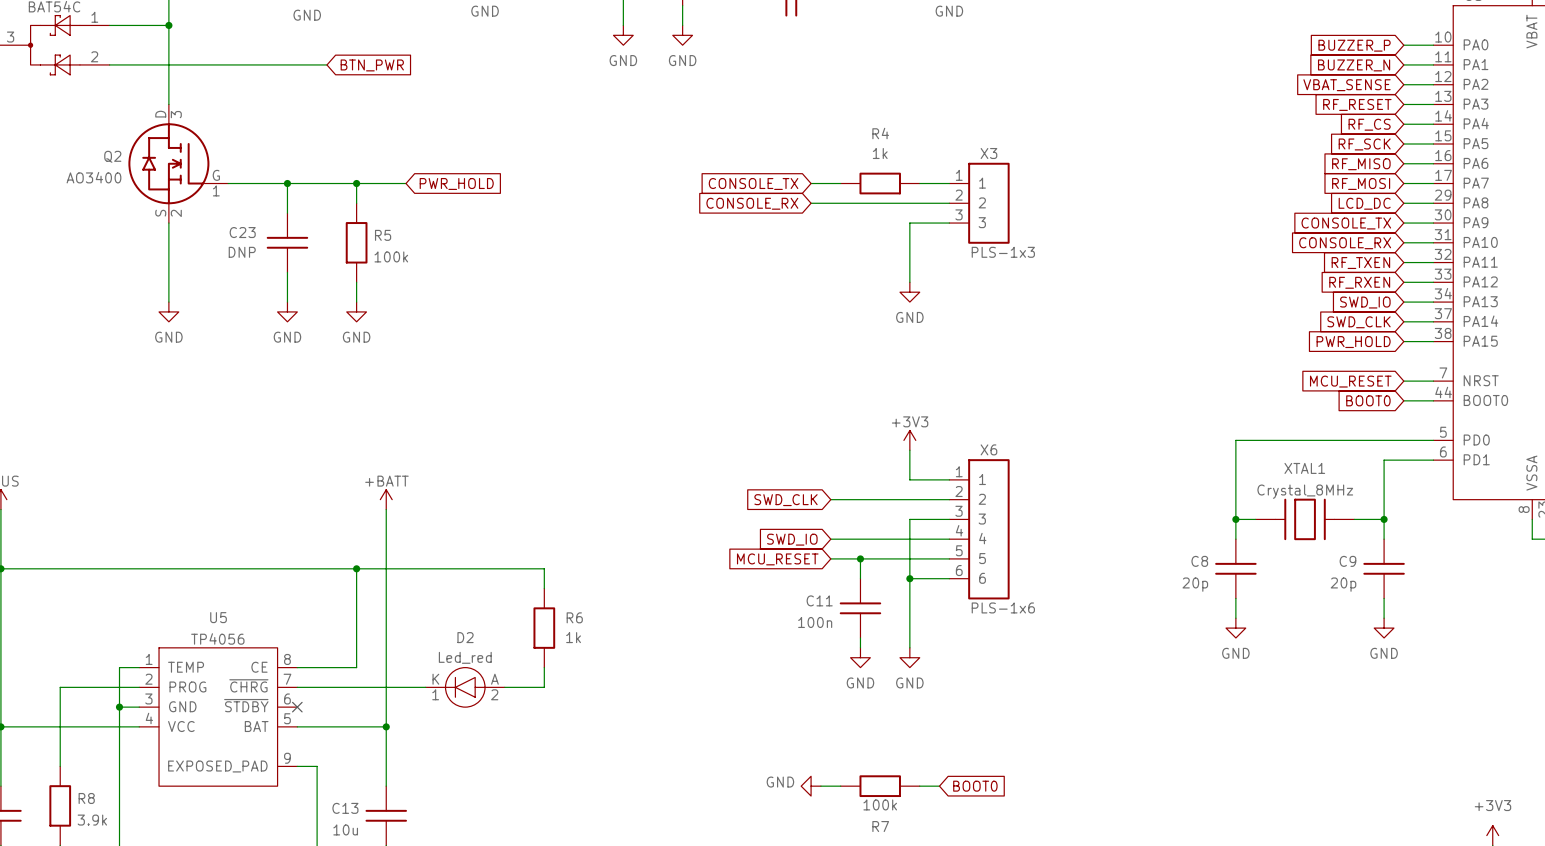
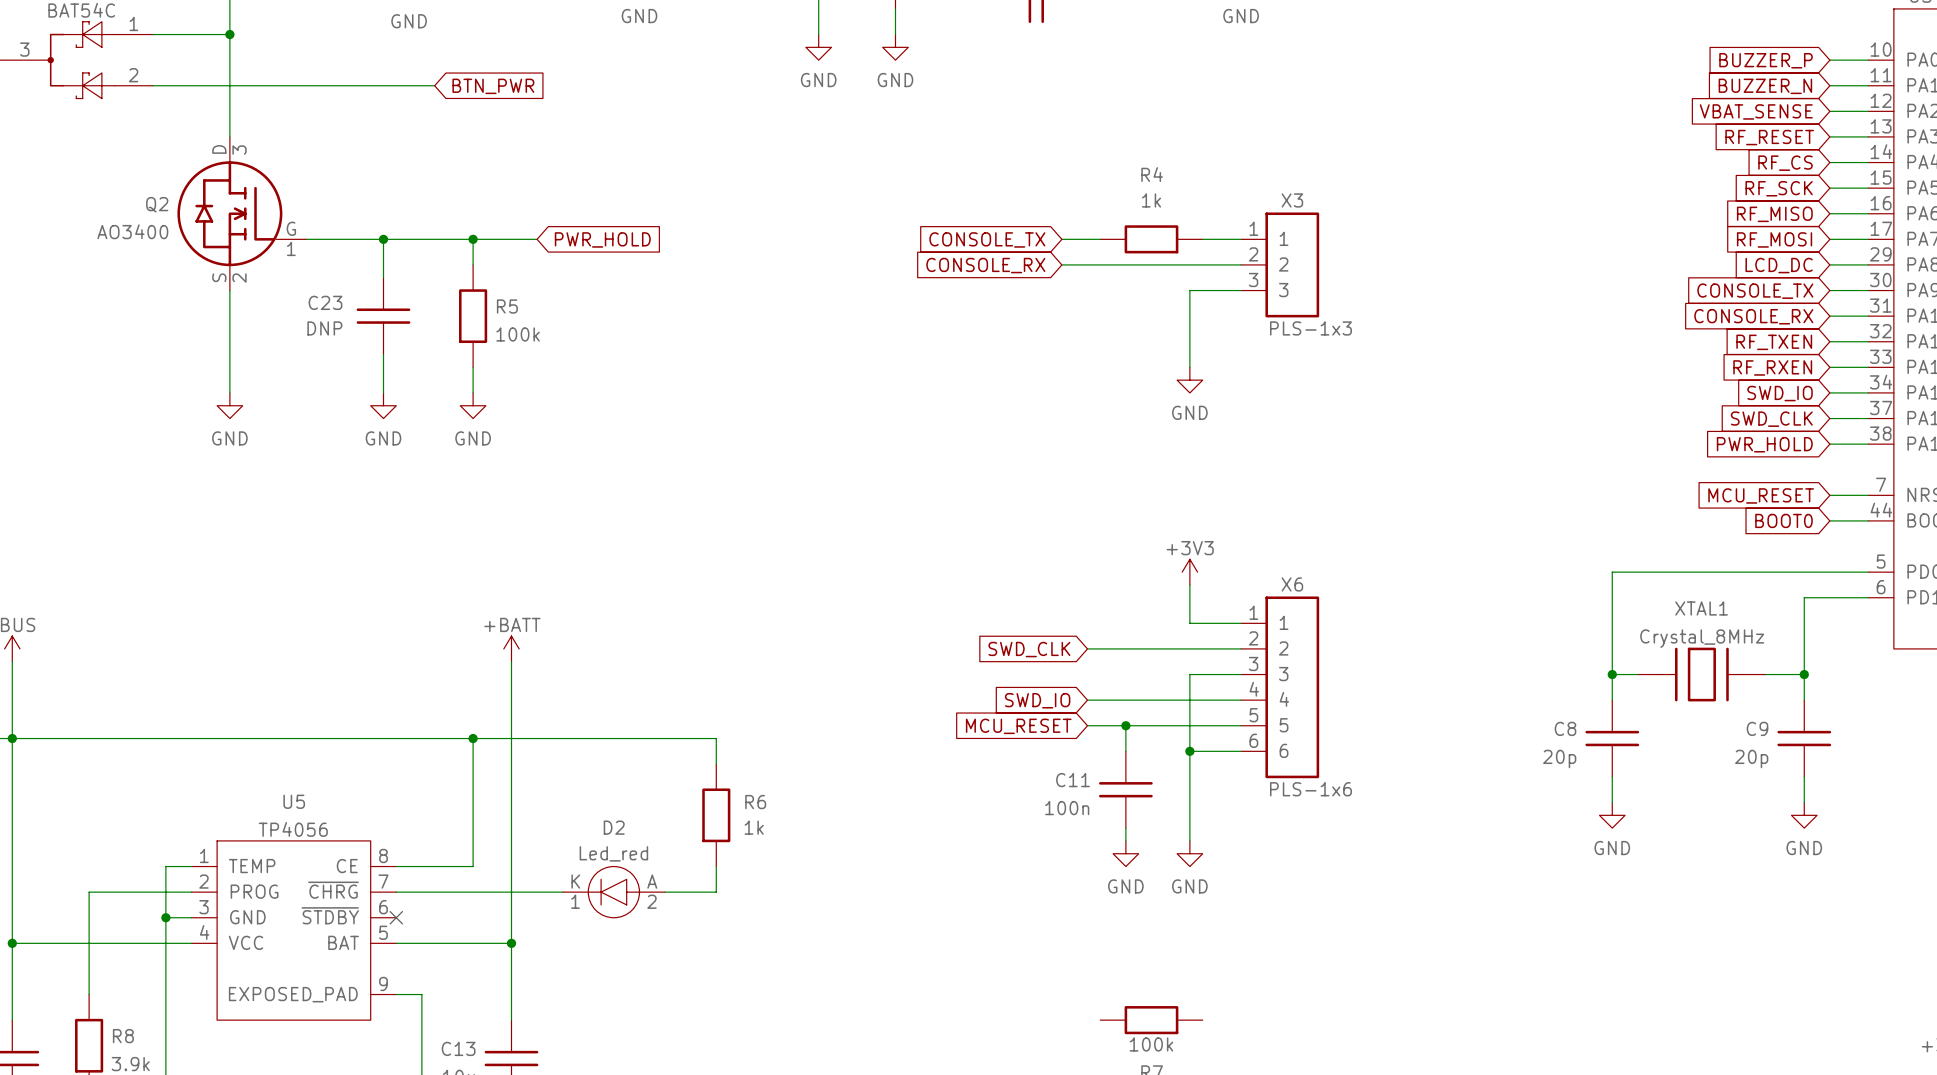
power symbol: GND (811, 786) -> none
wire: (820, 786) (840, 786) -> none
wire: (919, 786) (939, 786) -> none
global label: BOOT0 (975, 786) -> none

